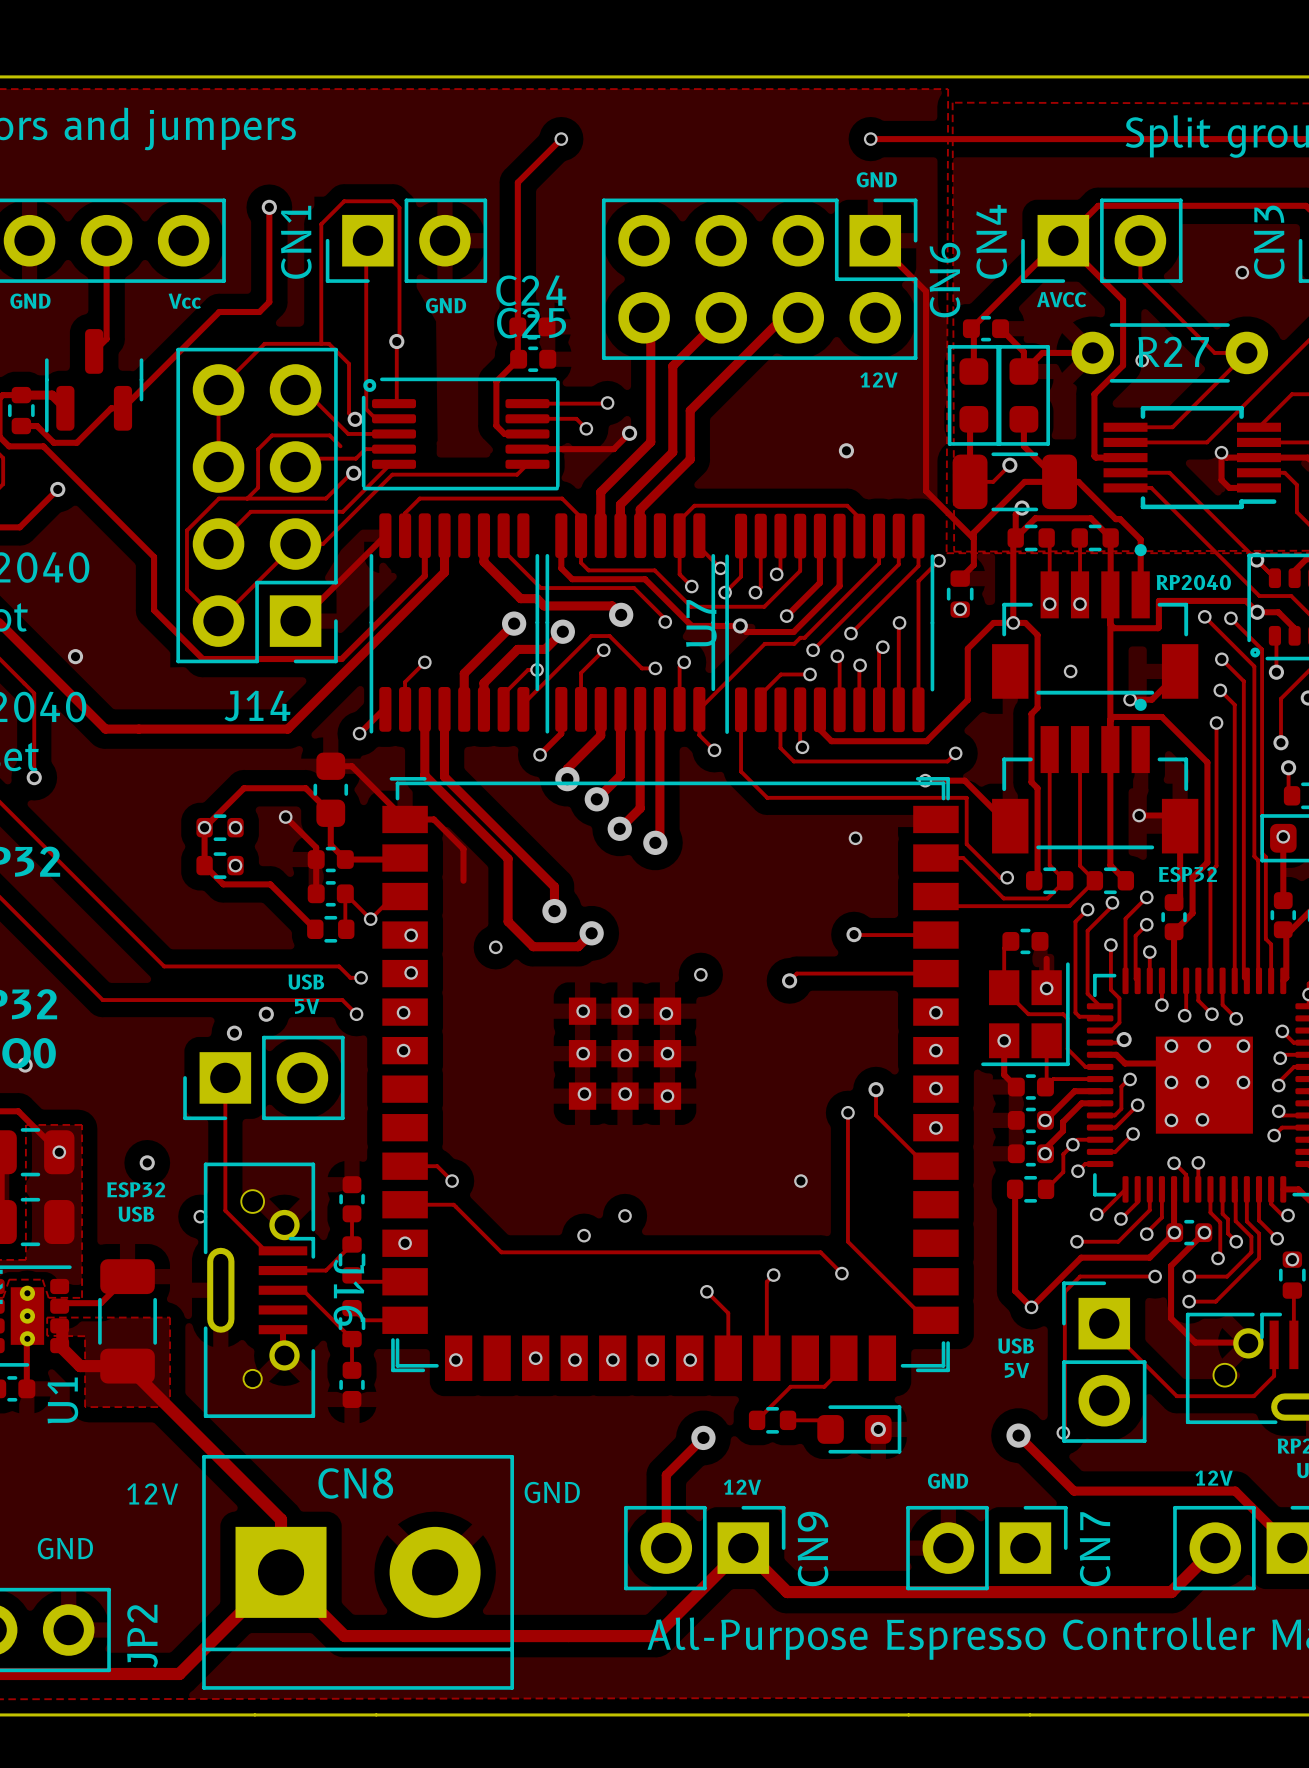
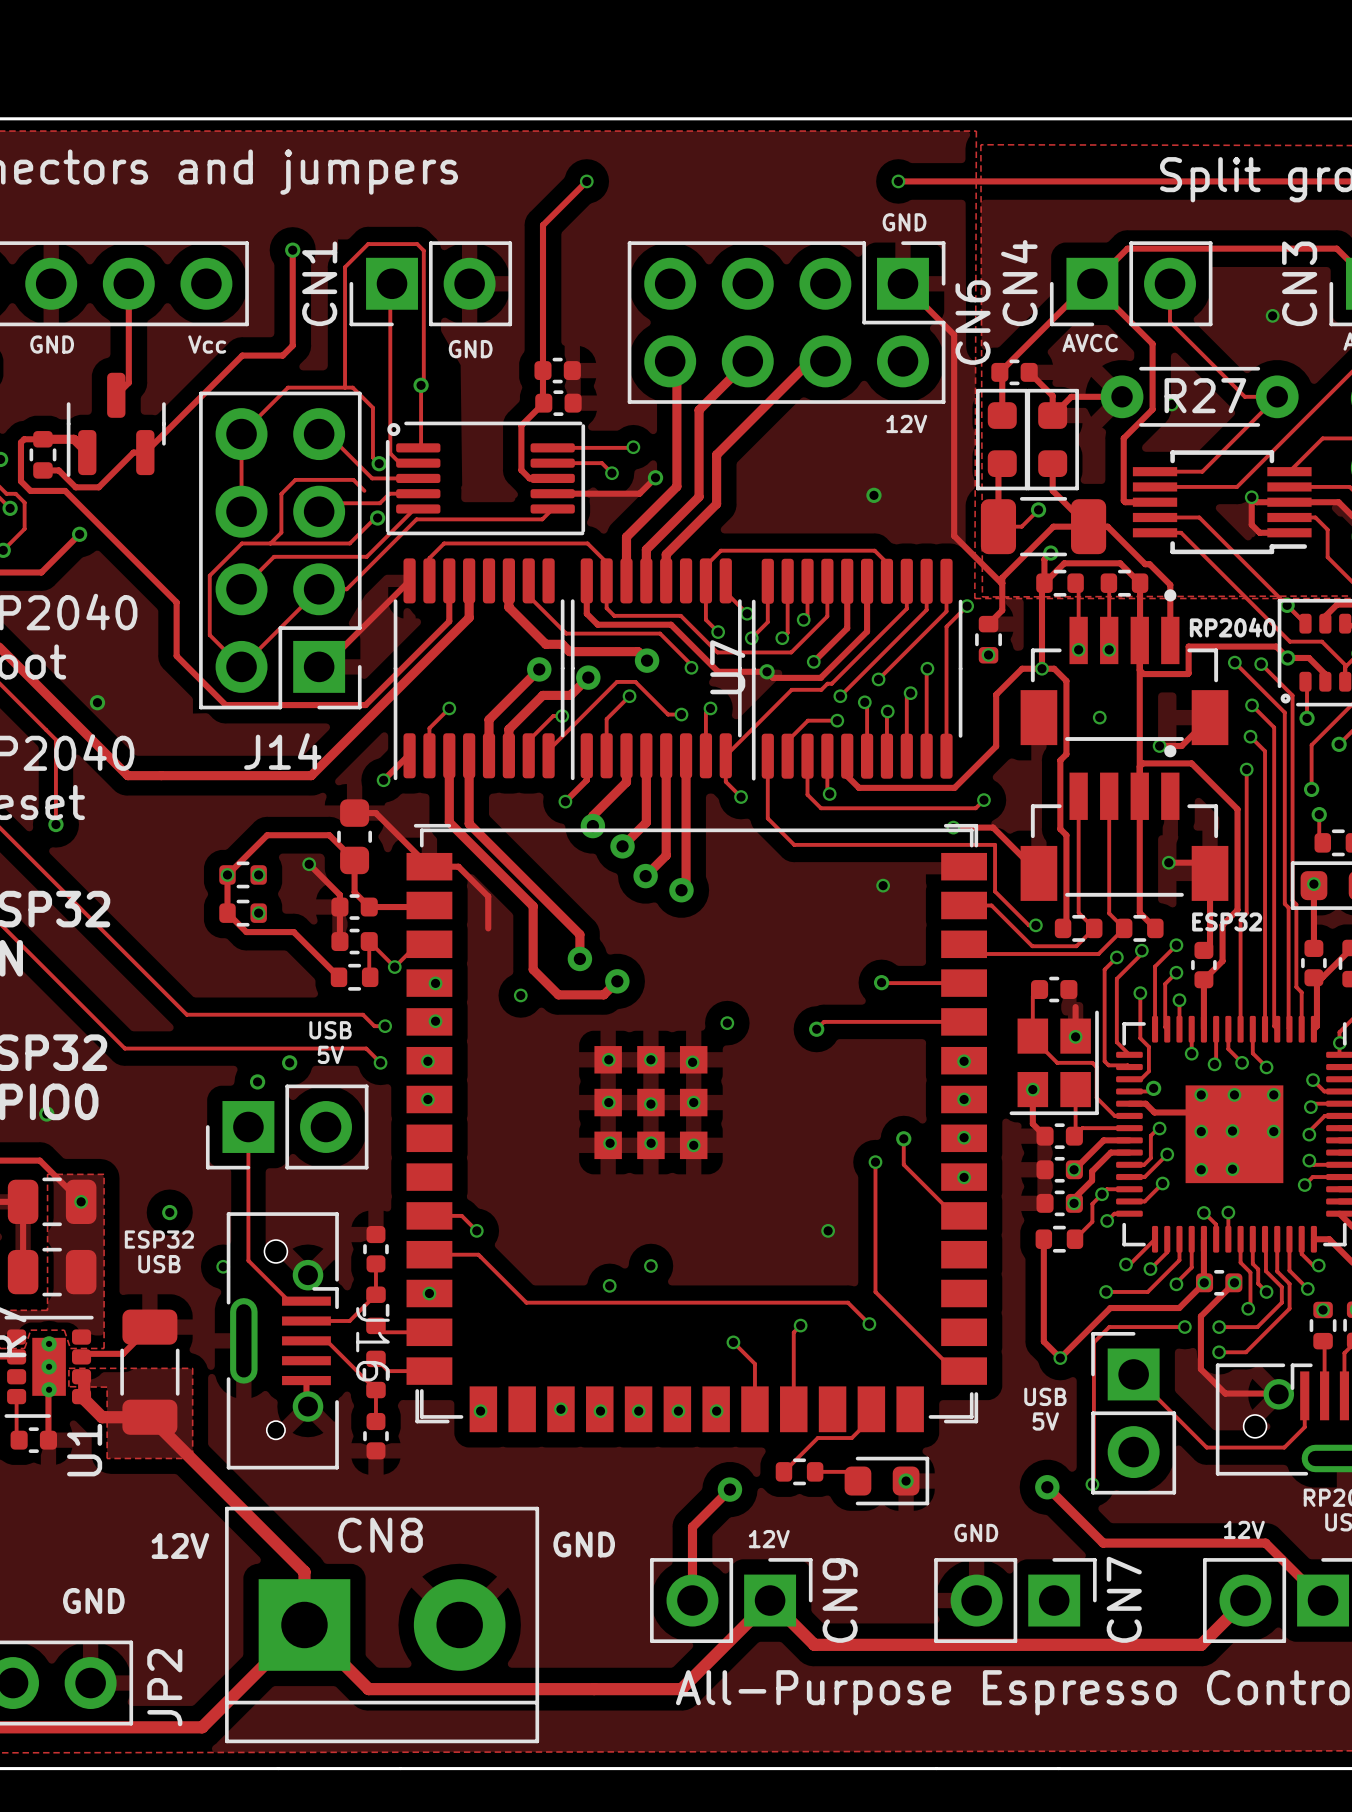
C24 name: C24 (531, 290) -> none
C25 name: C25 (531, 323) -> none

